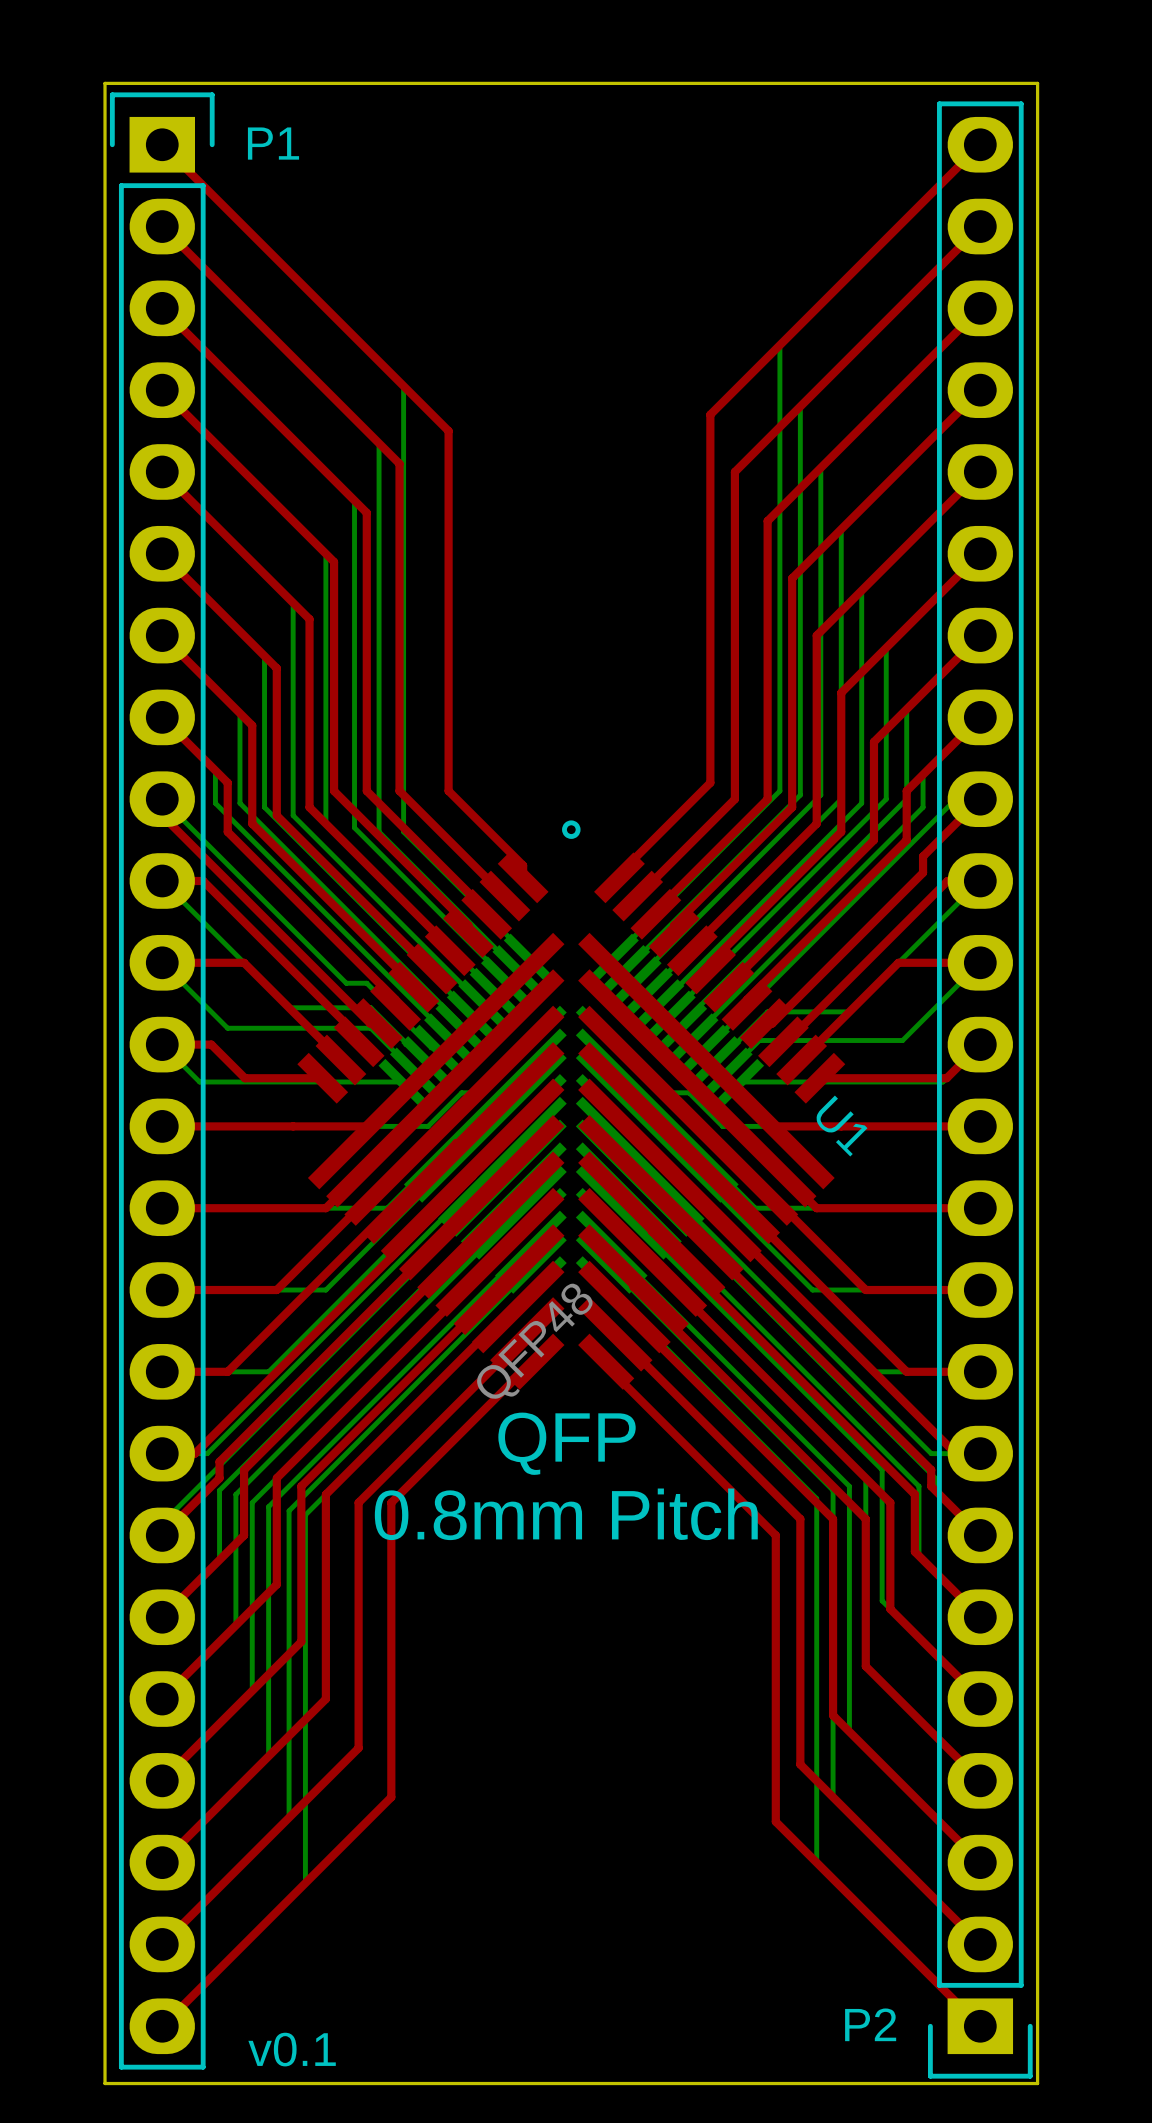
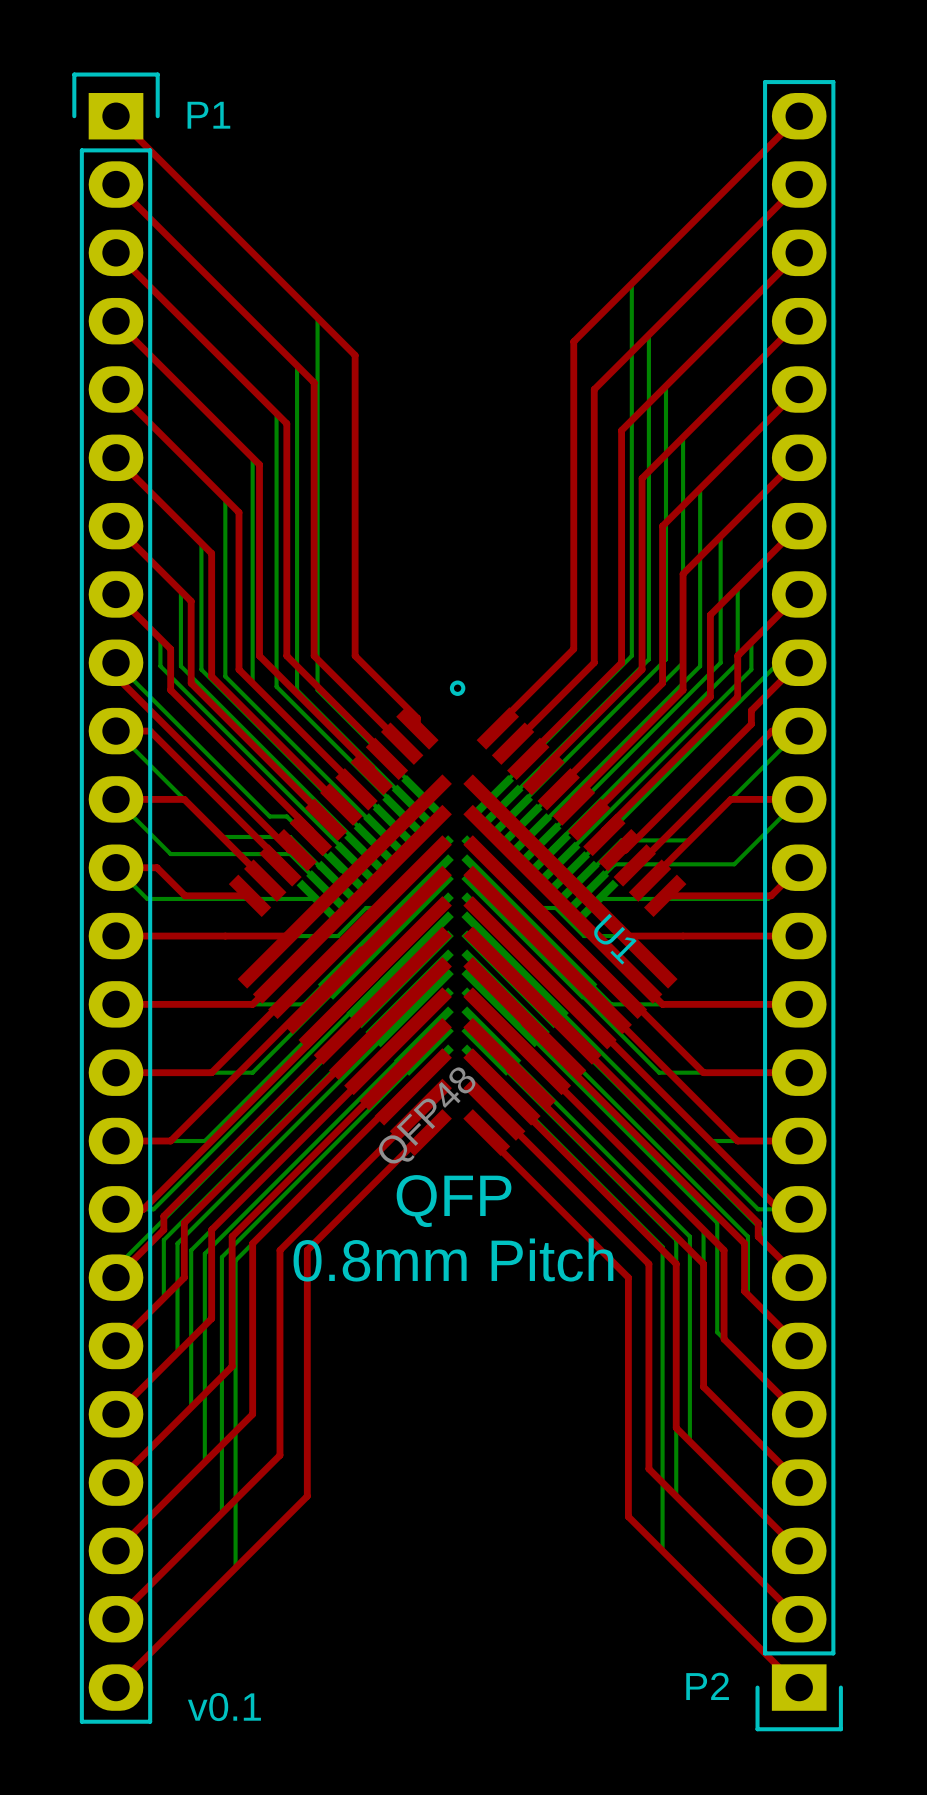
board edge: (105, 83) (105, 2083) (1037, 2083) (1037, 83) (105, 83) -> none
U1 name position: U1 (841, 1126) -> U1 (615, 939)

